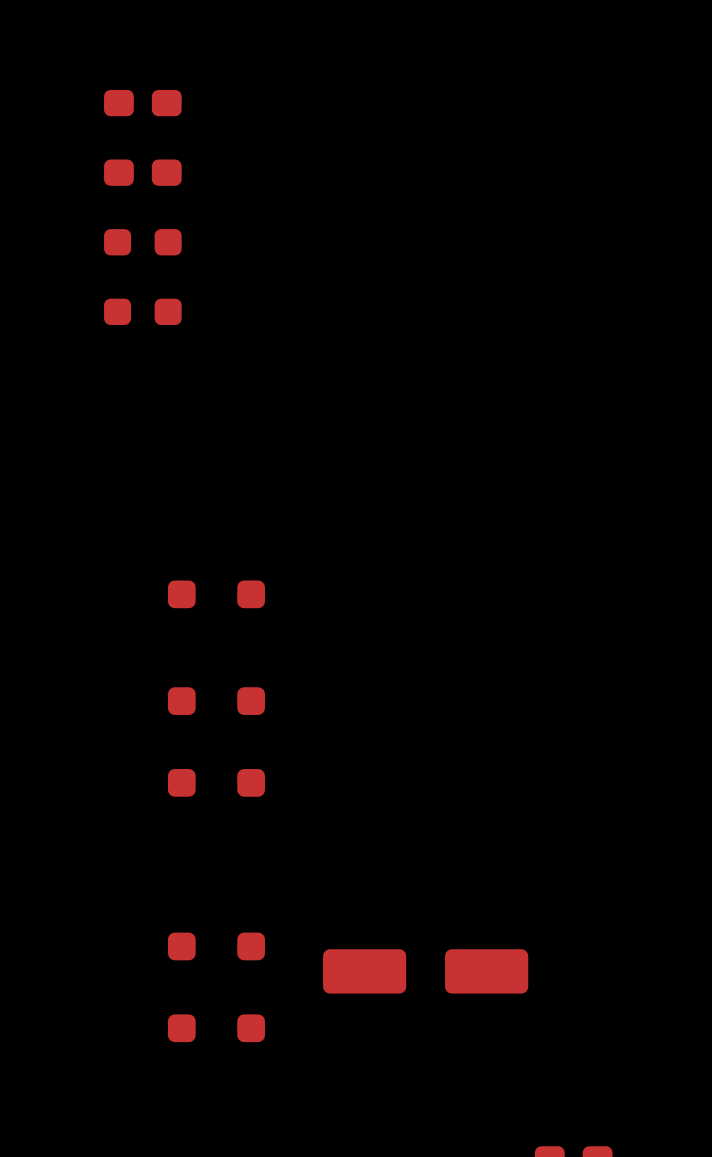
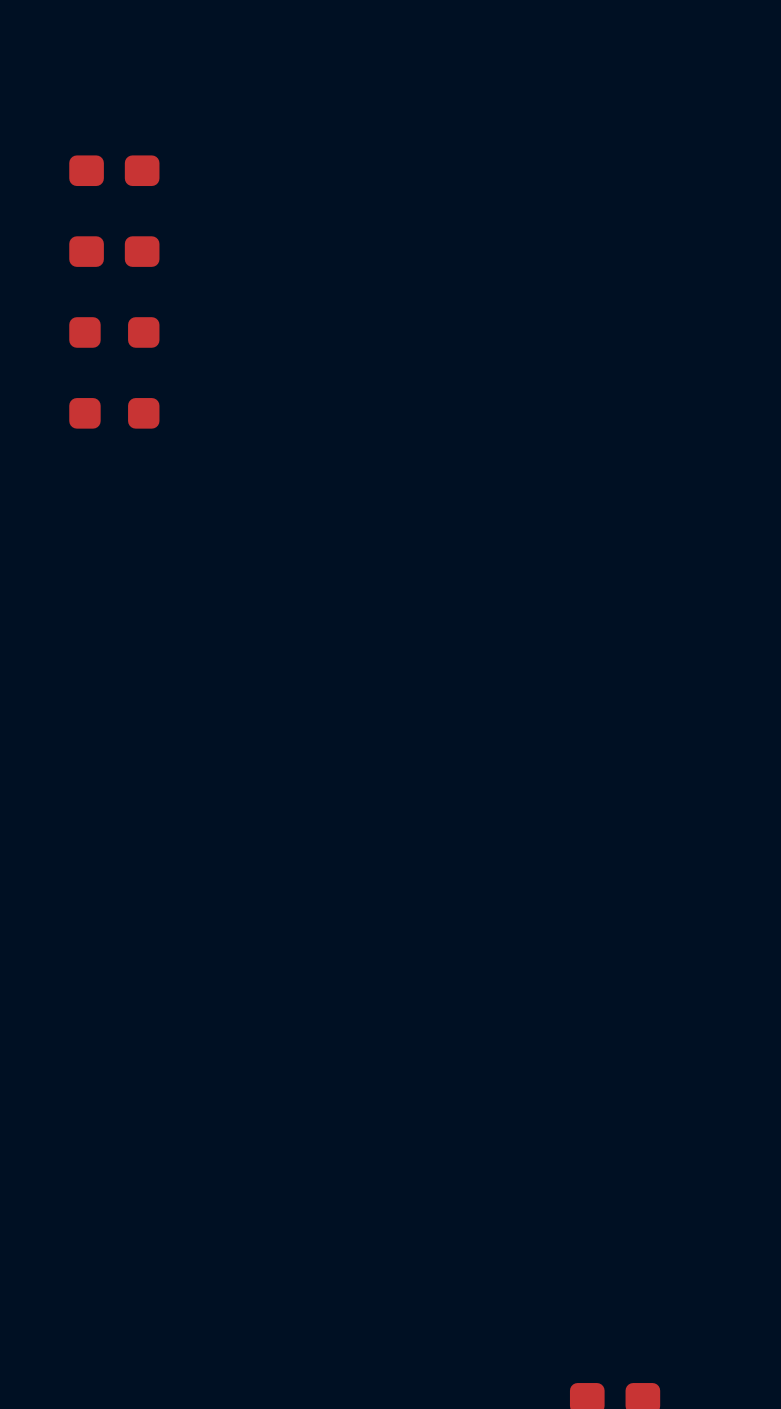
part: (216, 594) -> none
part: (216, 701) -> none
part: (216, 782) -> none
part: (216, 946) -> none
part: (425, 971) -> none
part: (216, 1028) -> none

